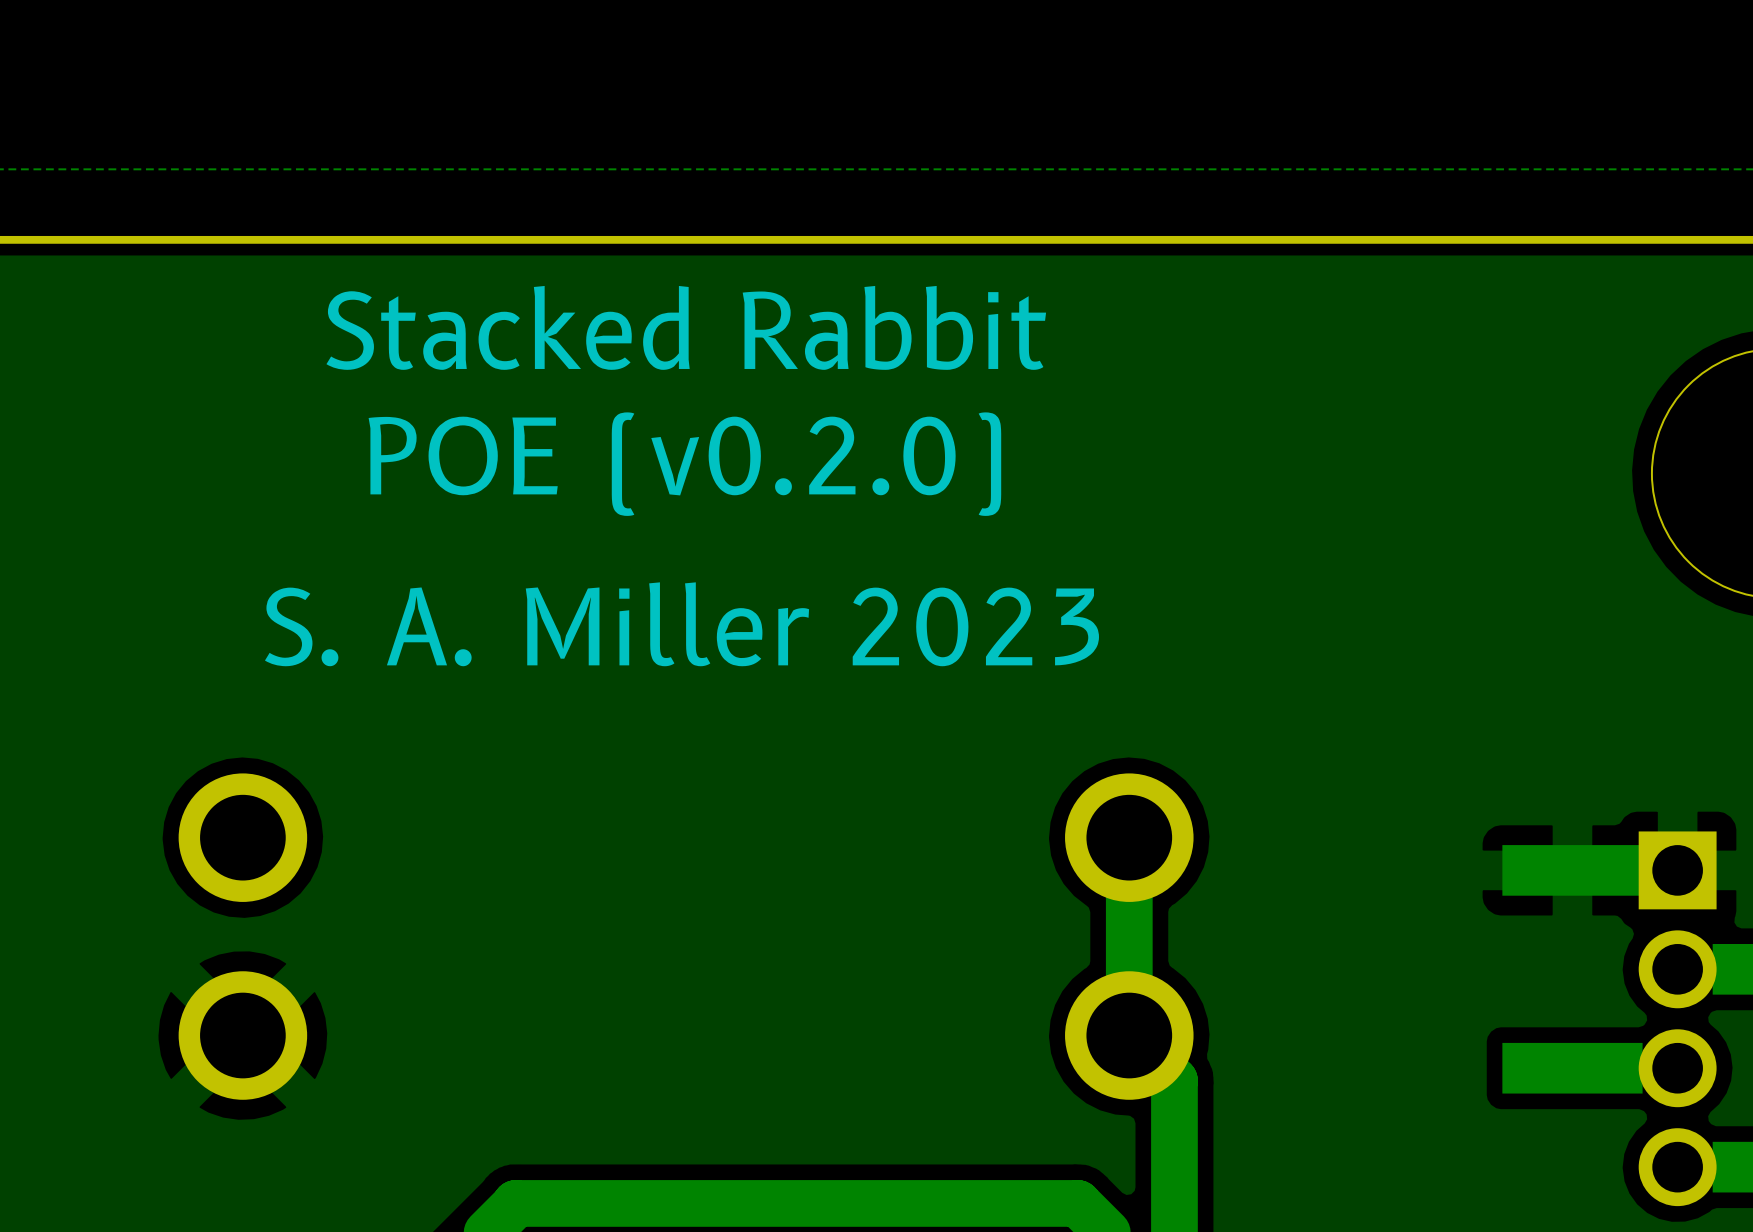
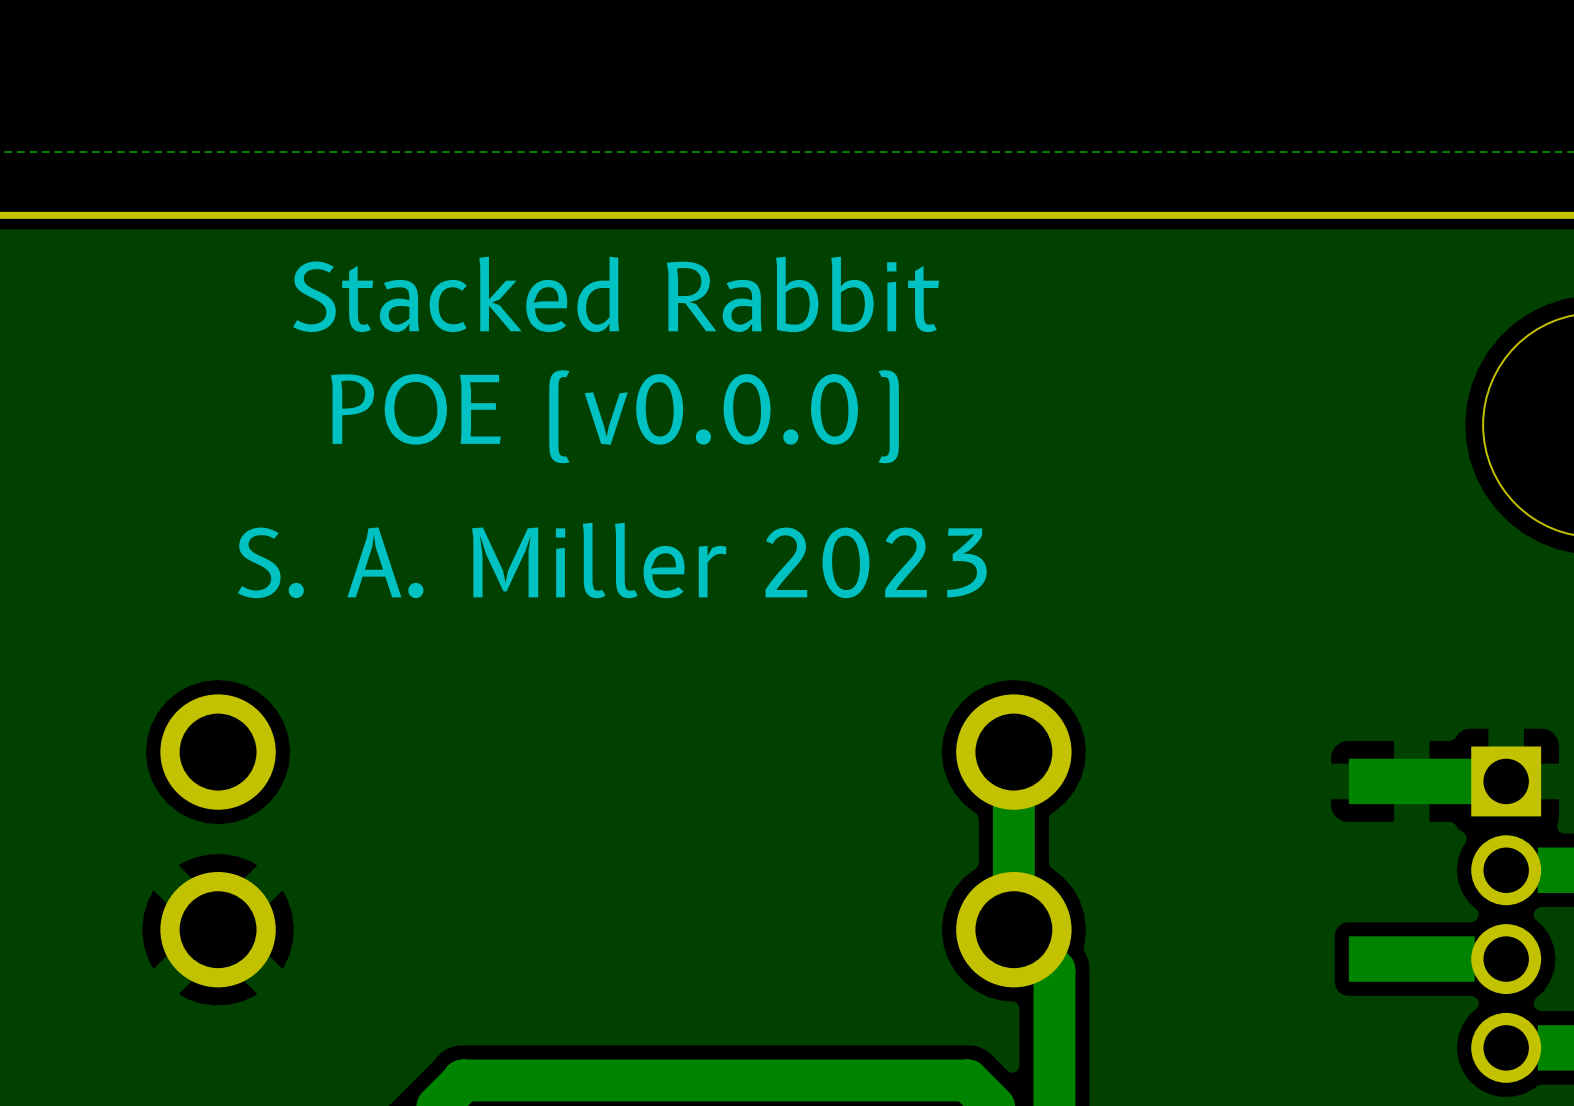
text: POE (v0.2.0) (684, 464) -> POE (v0.0.0) (614, 416)

